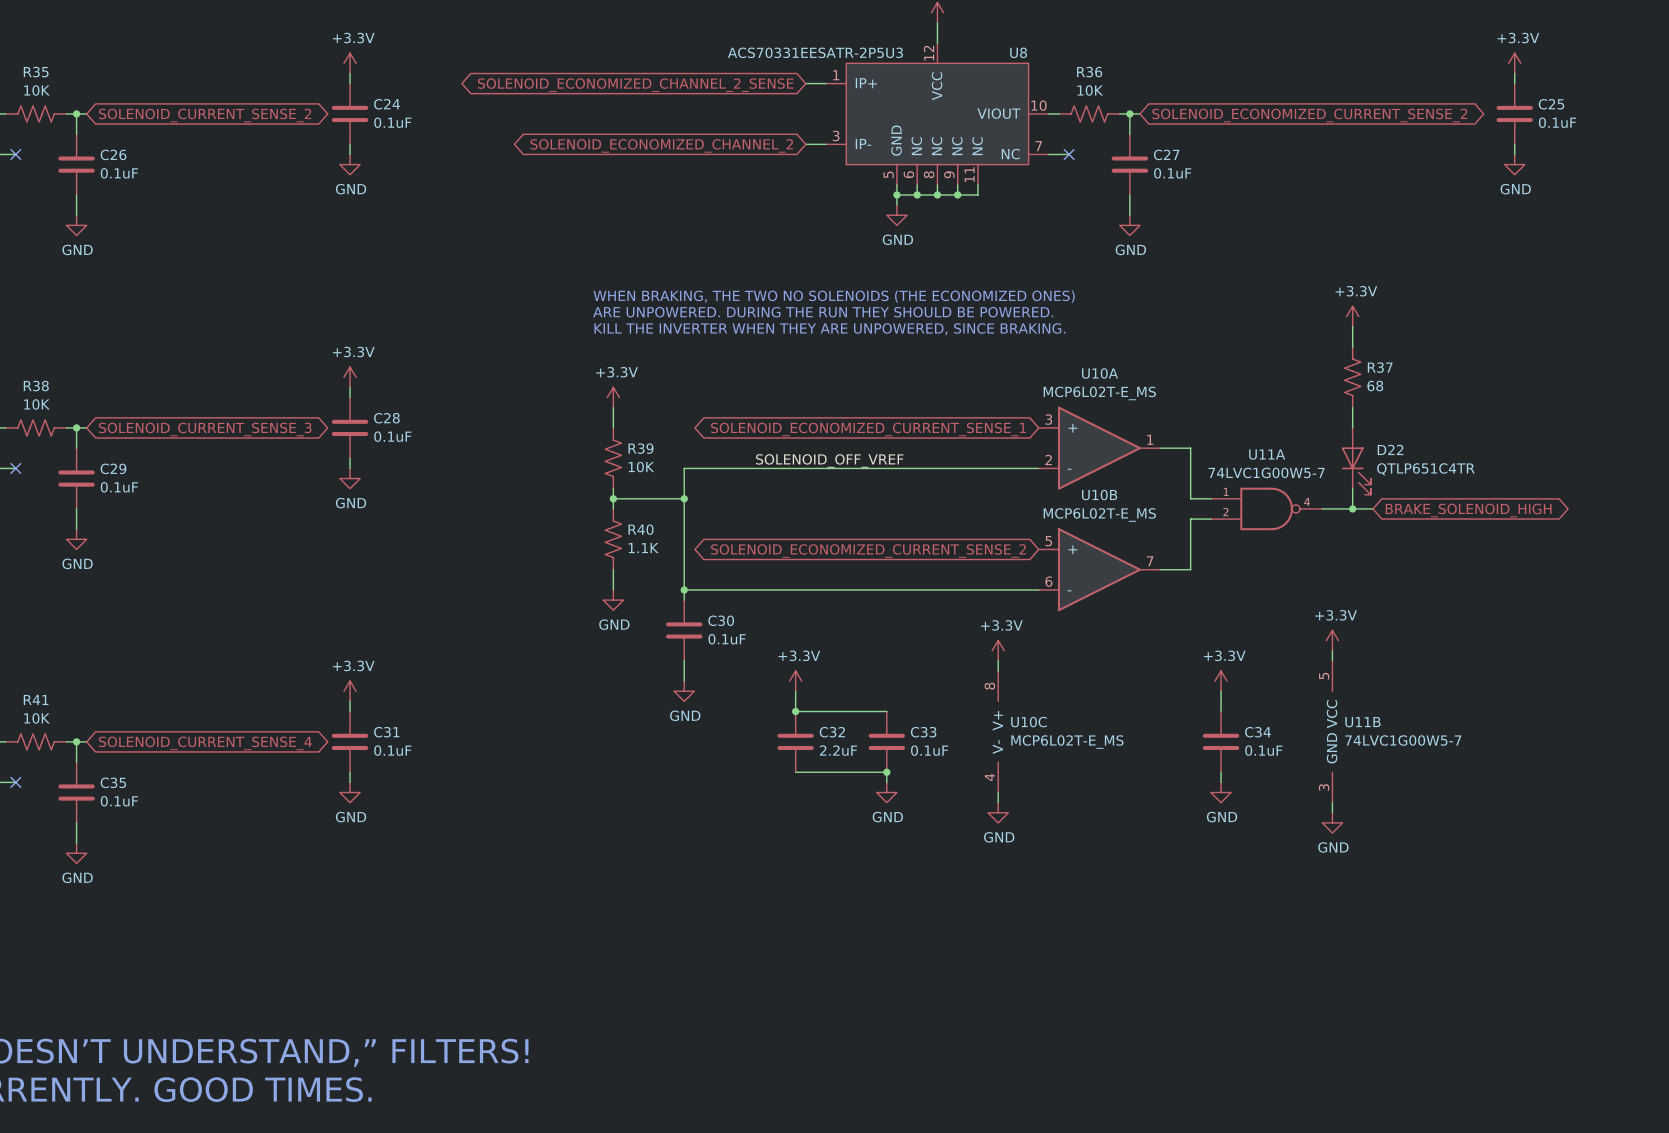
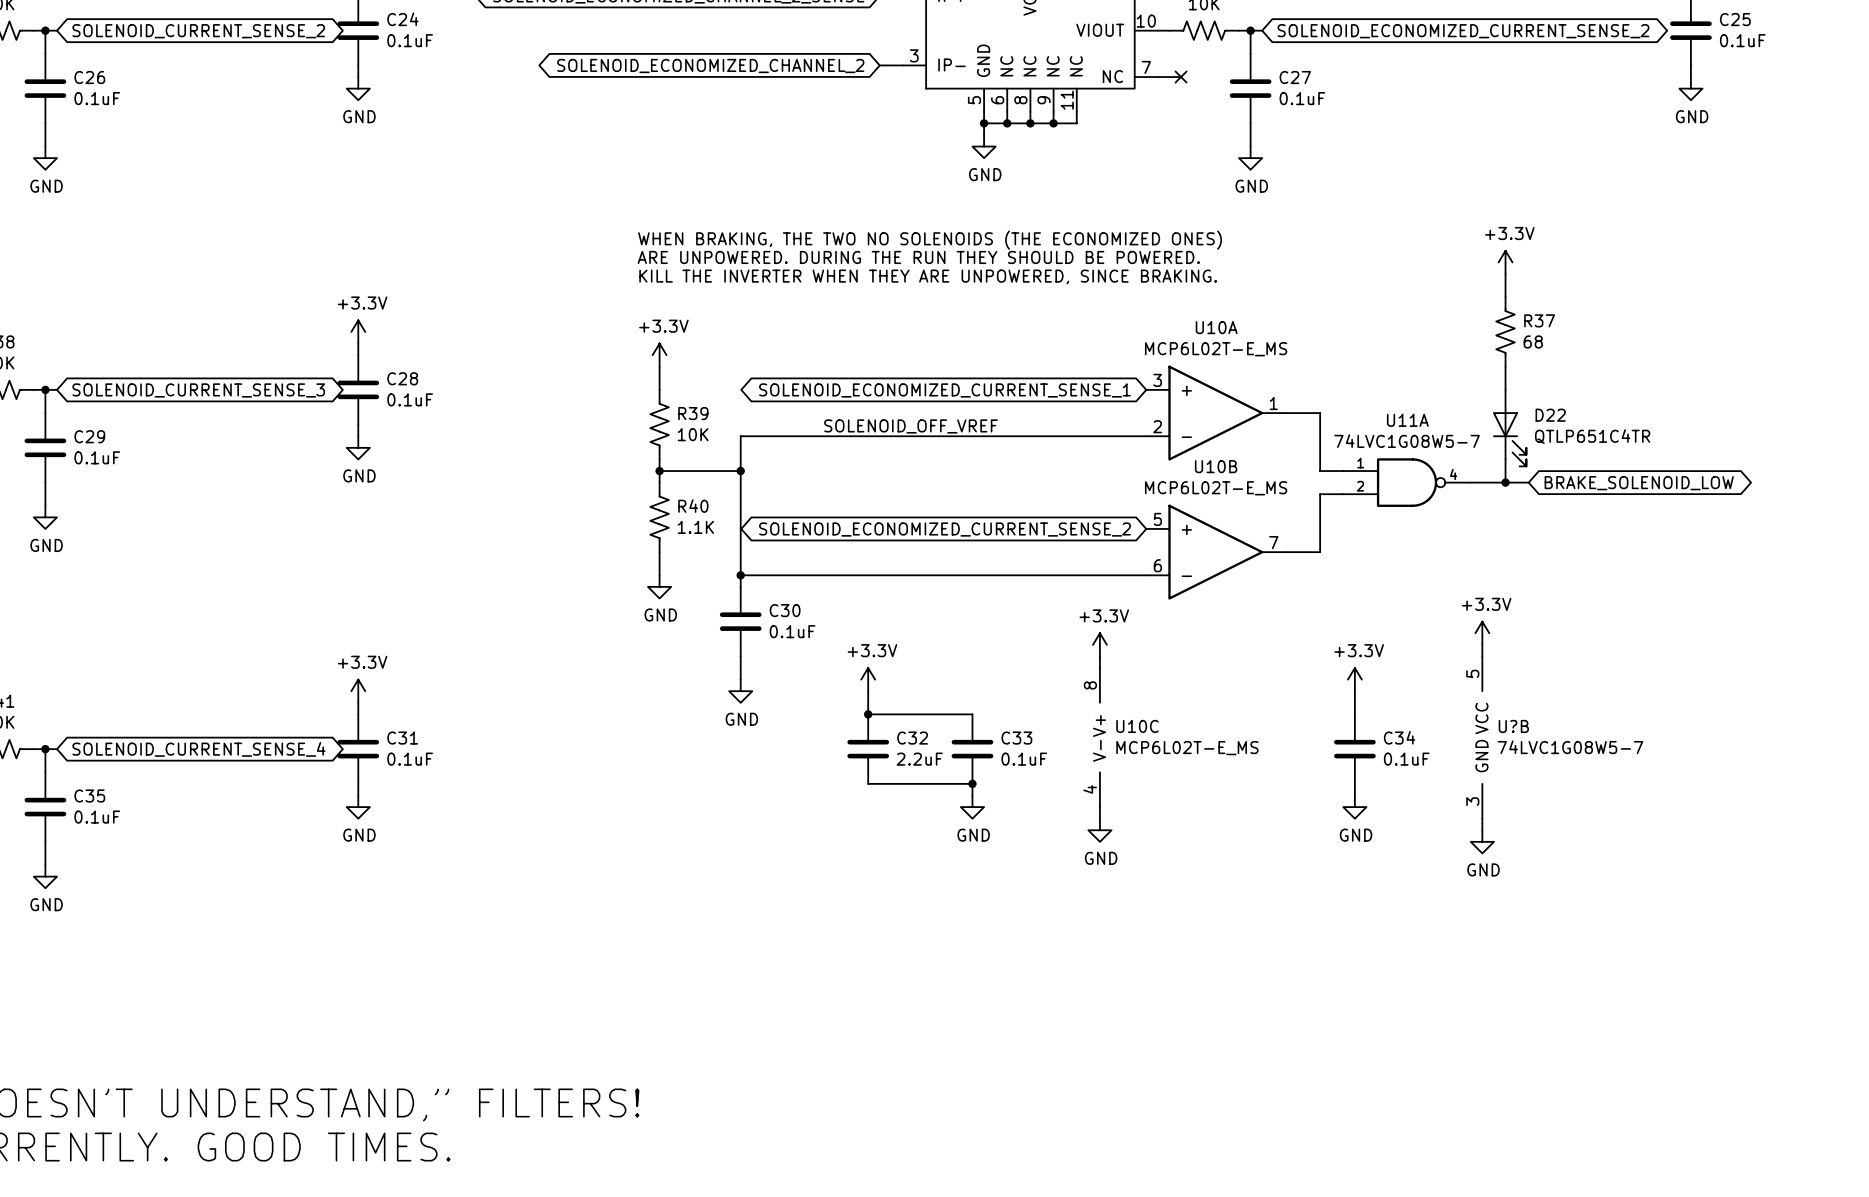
U11A value: 74LVC1G00W5-7 (1266, 472) -> 74LVC1G08W5-7 (1407, 441)
global label: BRAKE_SOLENOID_HIGH (1468, 510) -> BRAKE_SOLENOID_LOW (1639, 483)
U11B name: U11B (1362, 722) -> U?B (1513, 726)
U11B value: 74LVC1G00W5-7 (1403, 740) -> 74LVC1G08W5-7 (1570, 747)

